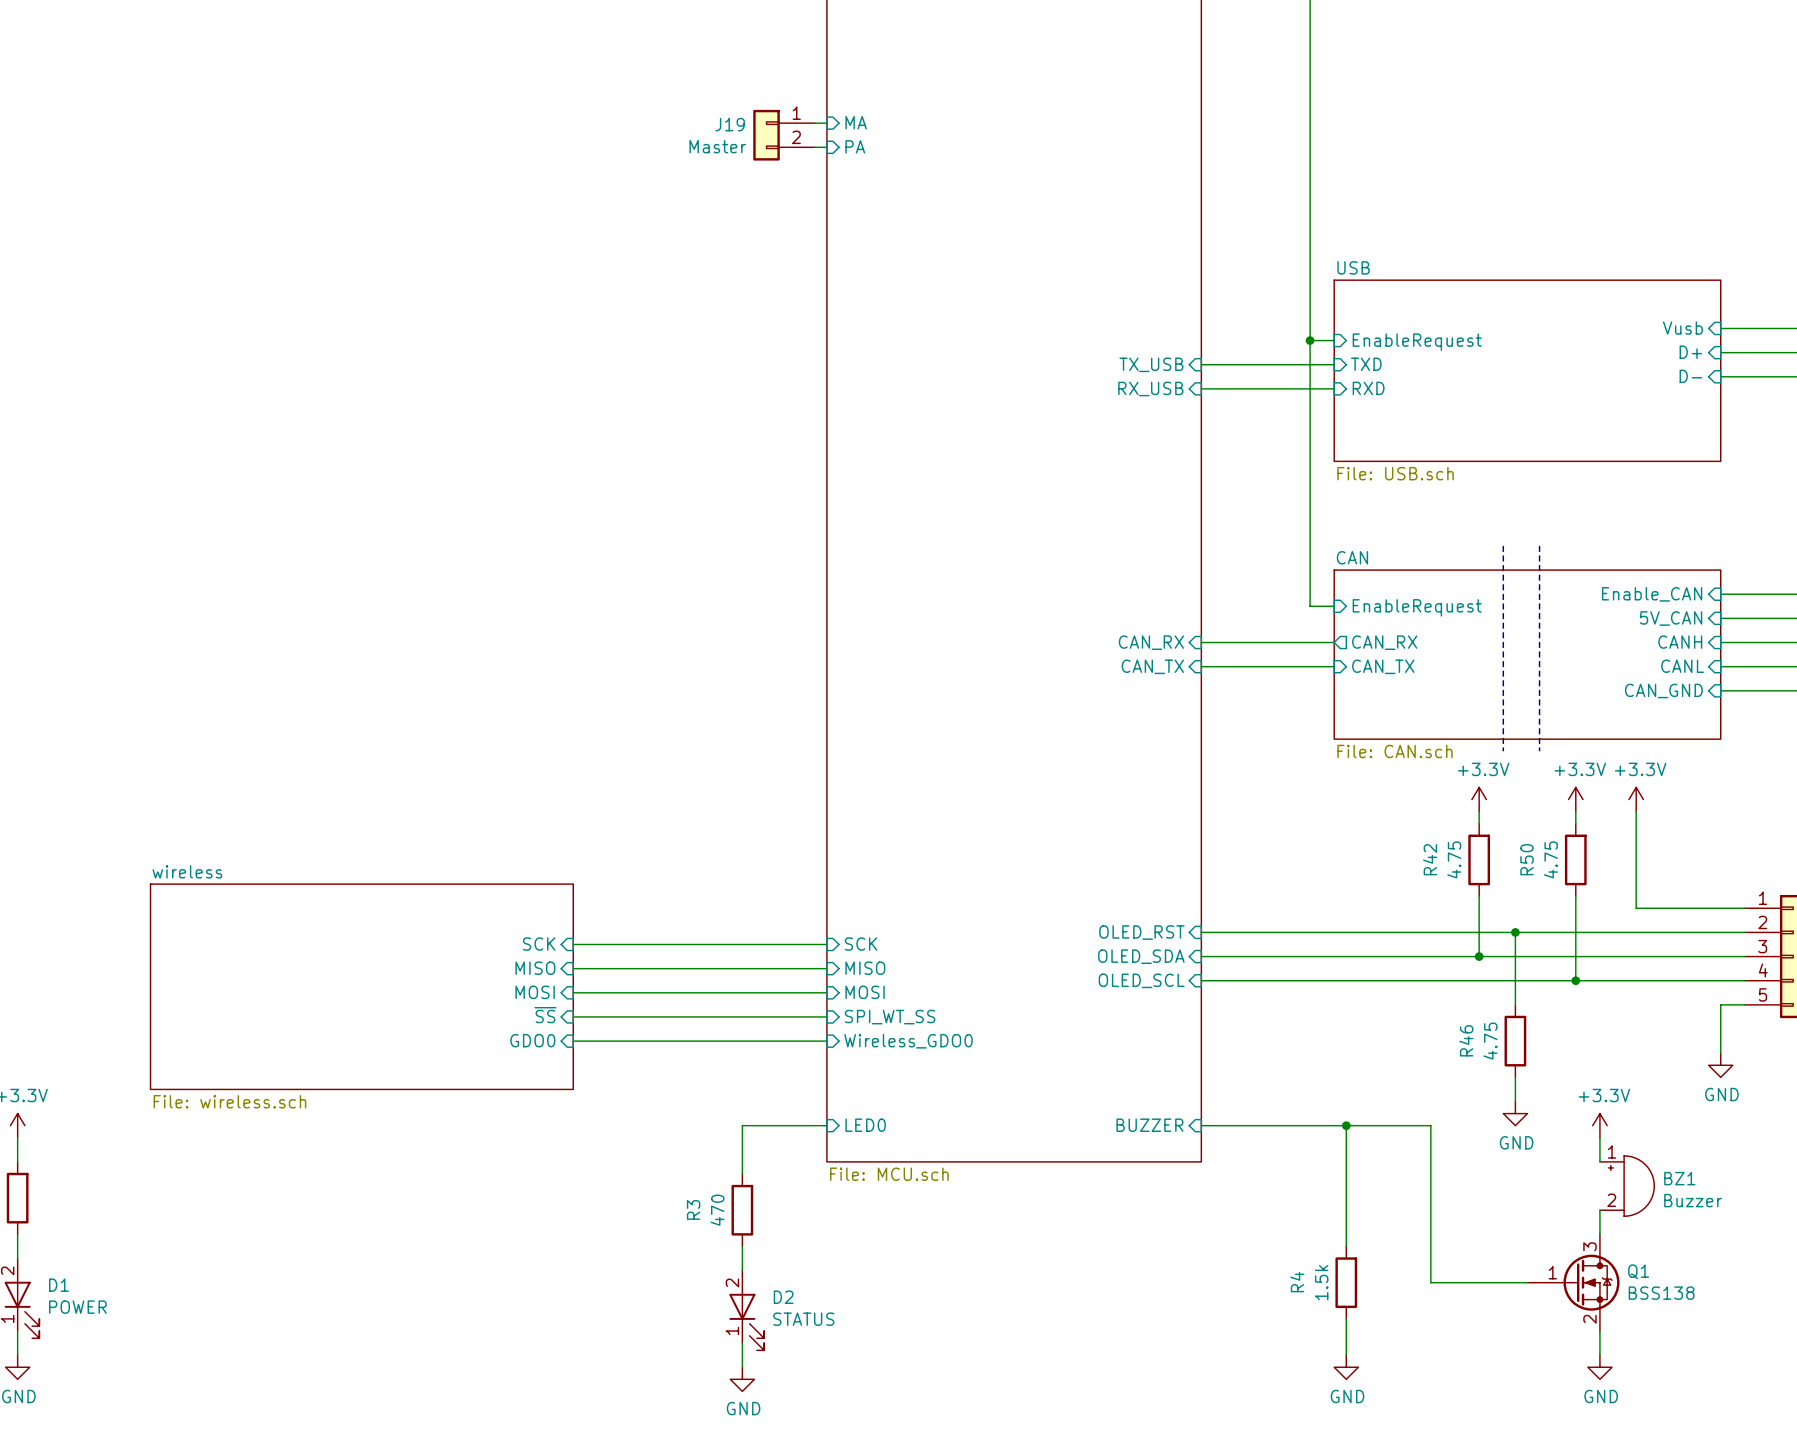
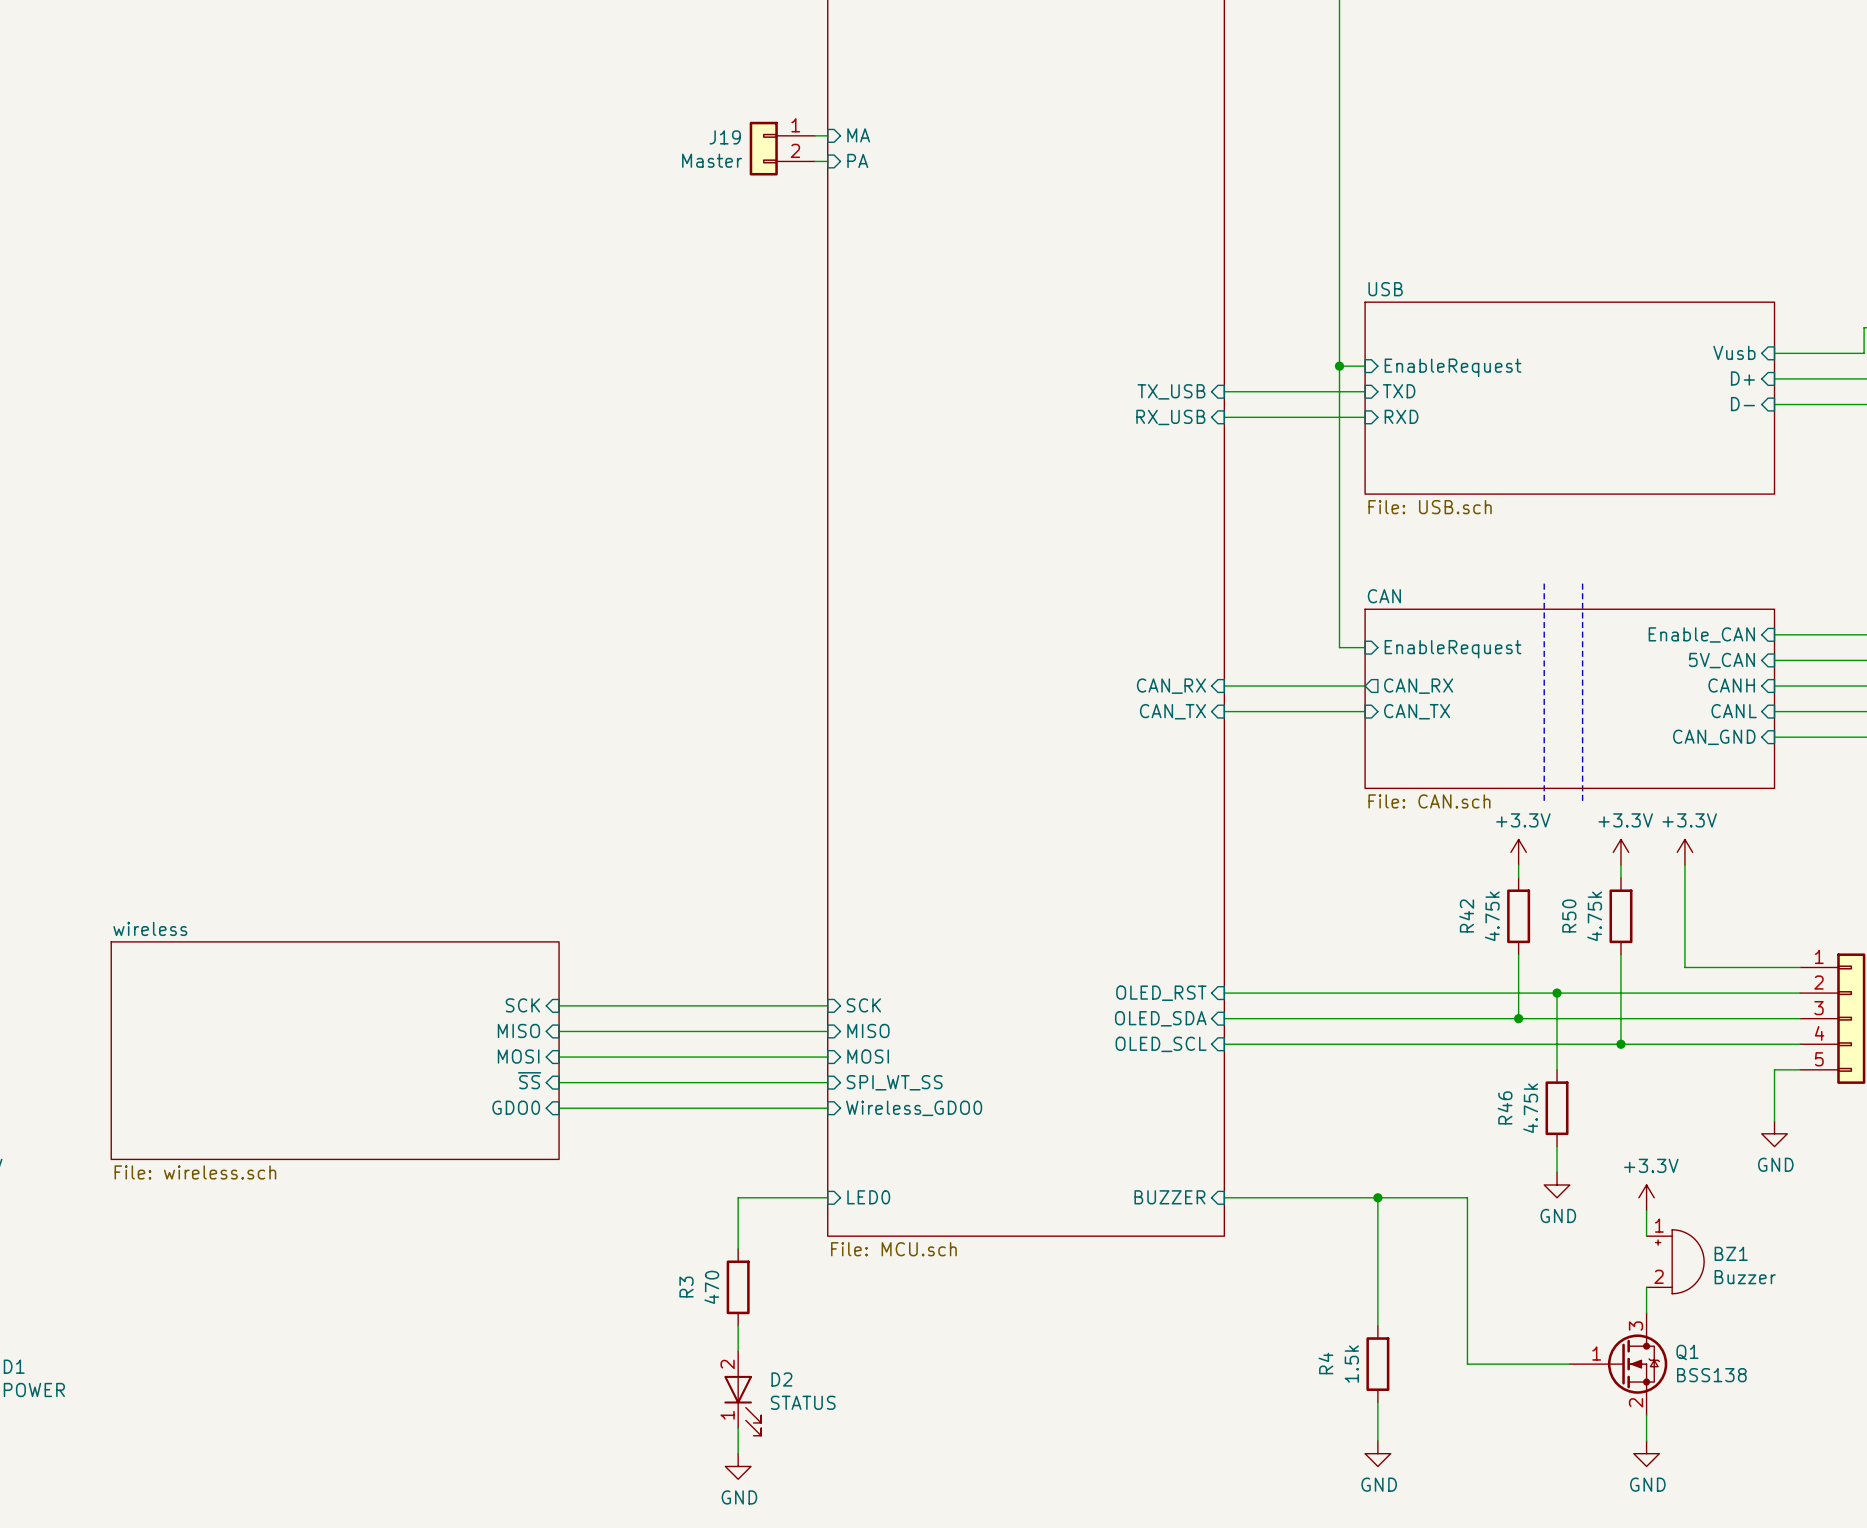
R42 value: 4.75 (1454, 859) -> 4.75k (1492, 916)
R50 value: 4.75 (1550, 859) -> 4.75k (1594, 916)
R46 value: 4.75 (1490, 1041) -> 4.75k (1530, 1108)

